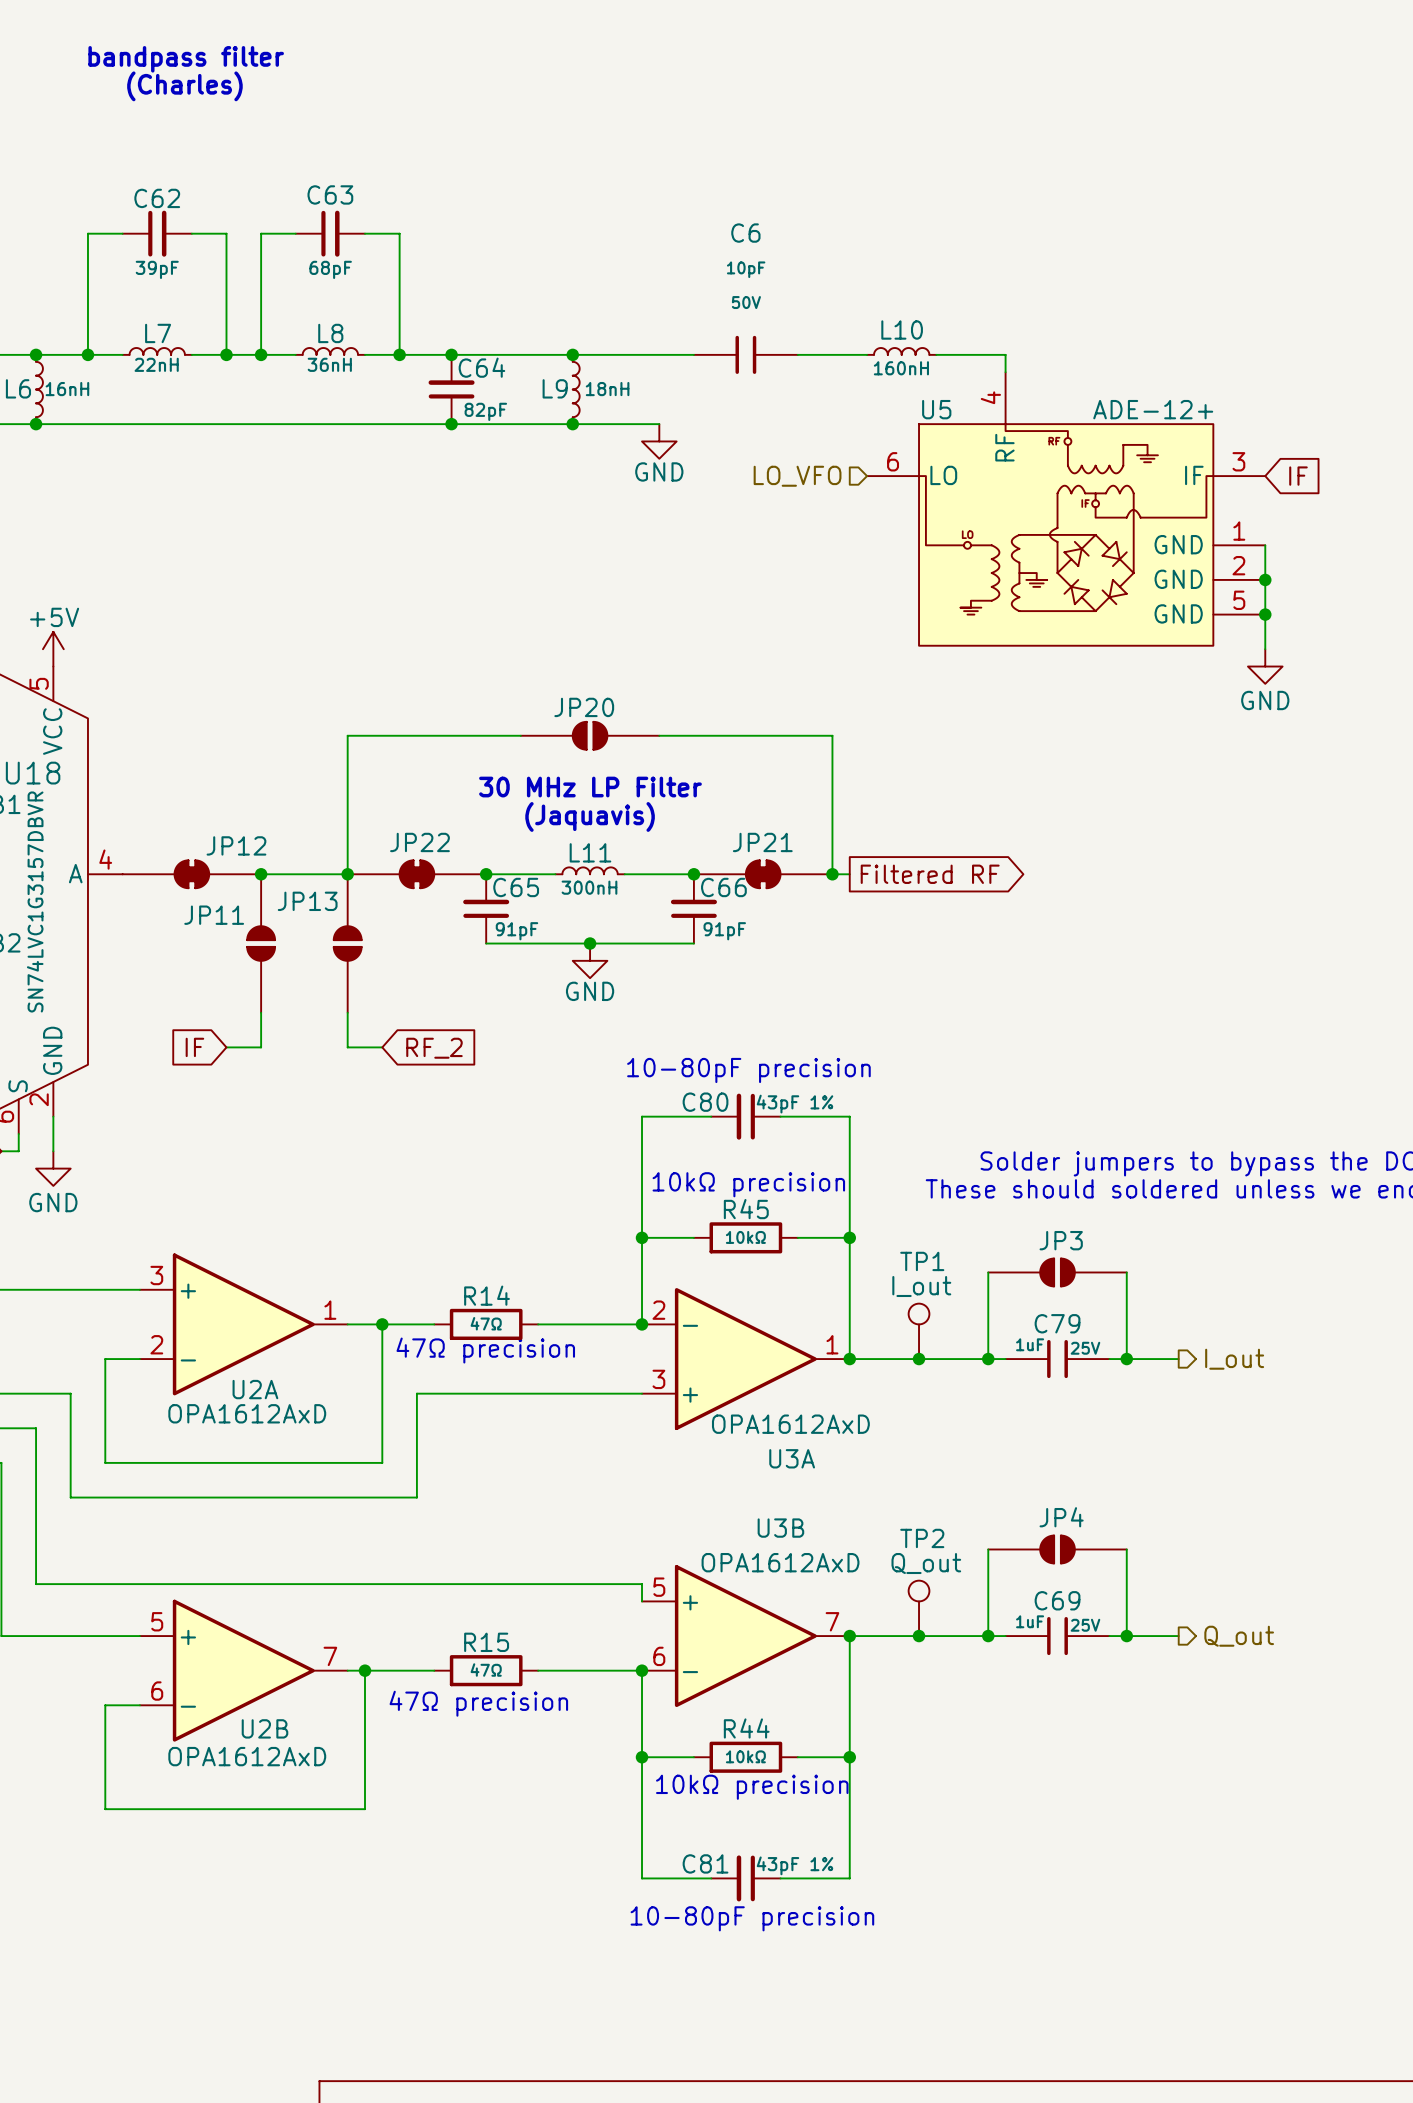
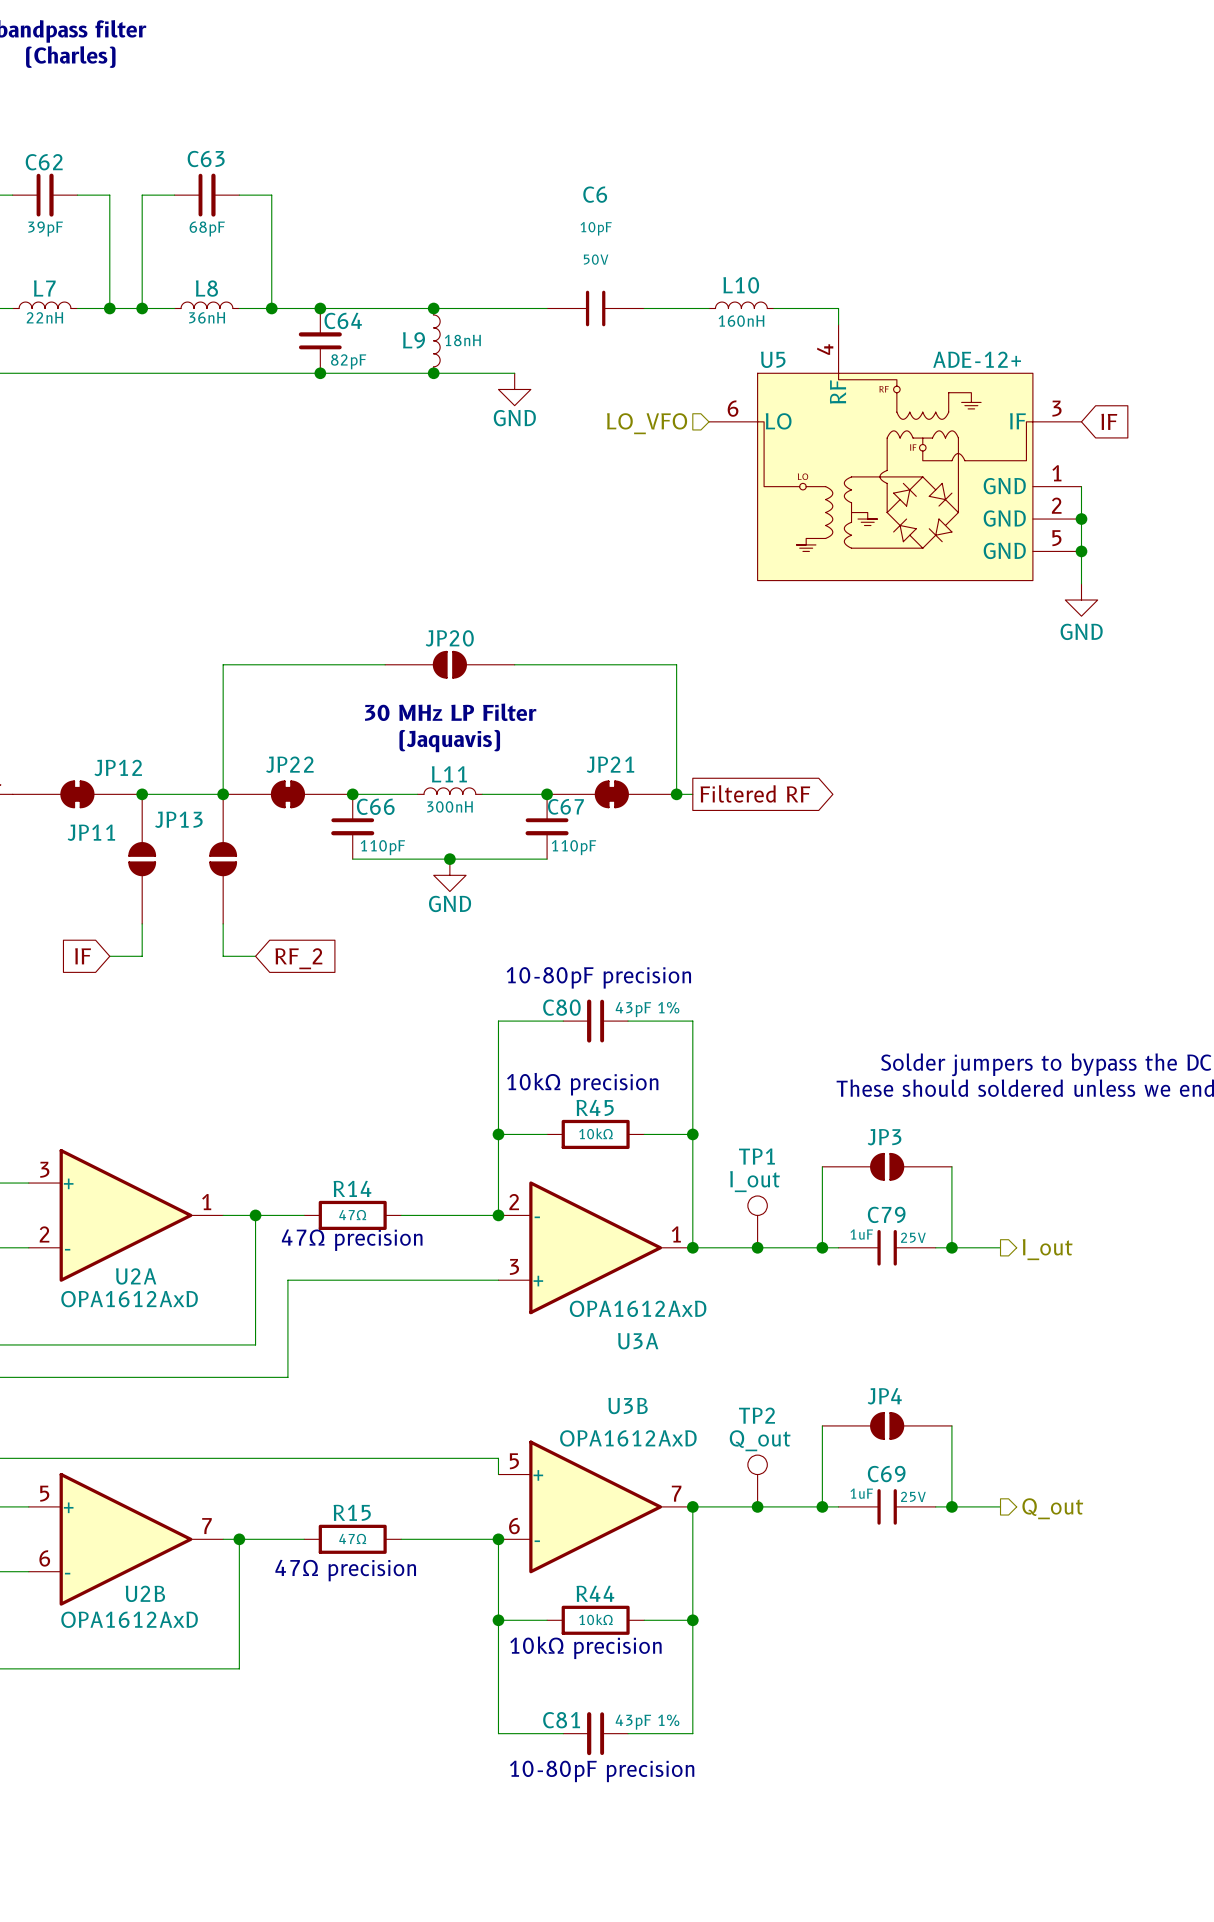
C65: 91pF (486, 908) -> none
C66 rotation: 0° (693, 908) -> 180° (352, 826)
C66 position: (693, 908) -> (352, 826)
C67: none -> 110pF (547, 826)
C66 value: 91pF (724, 931) -> 110pF (382, 847)

